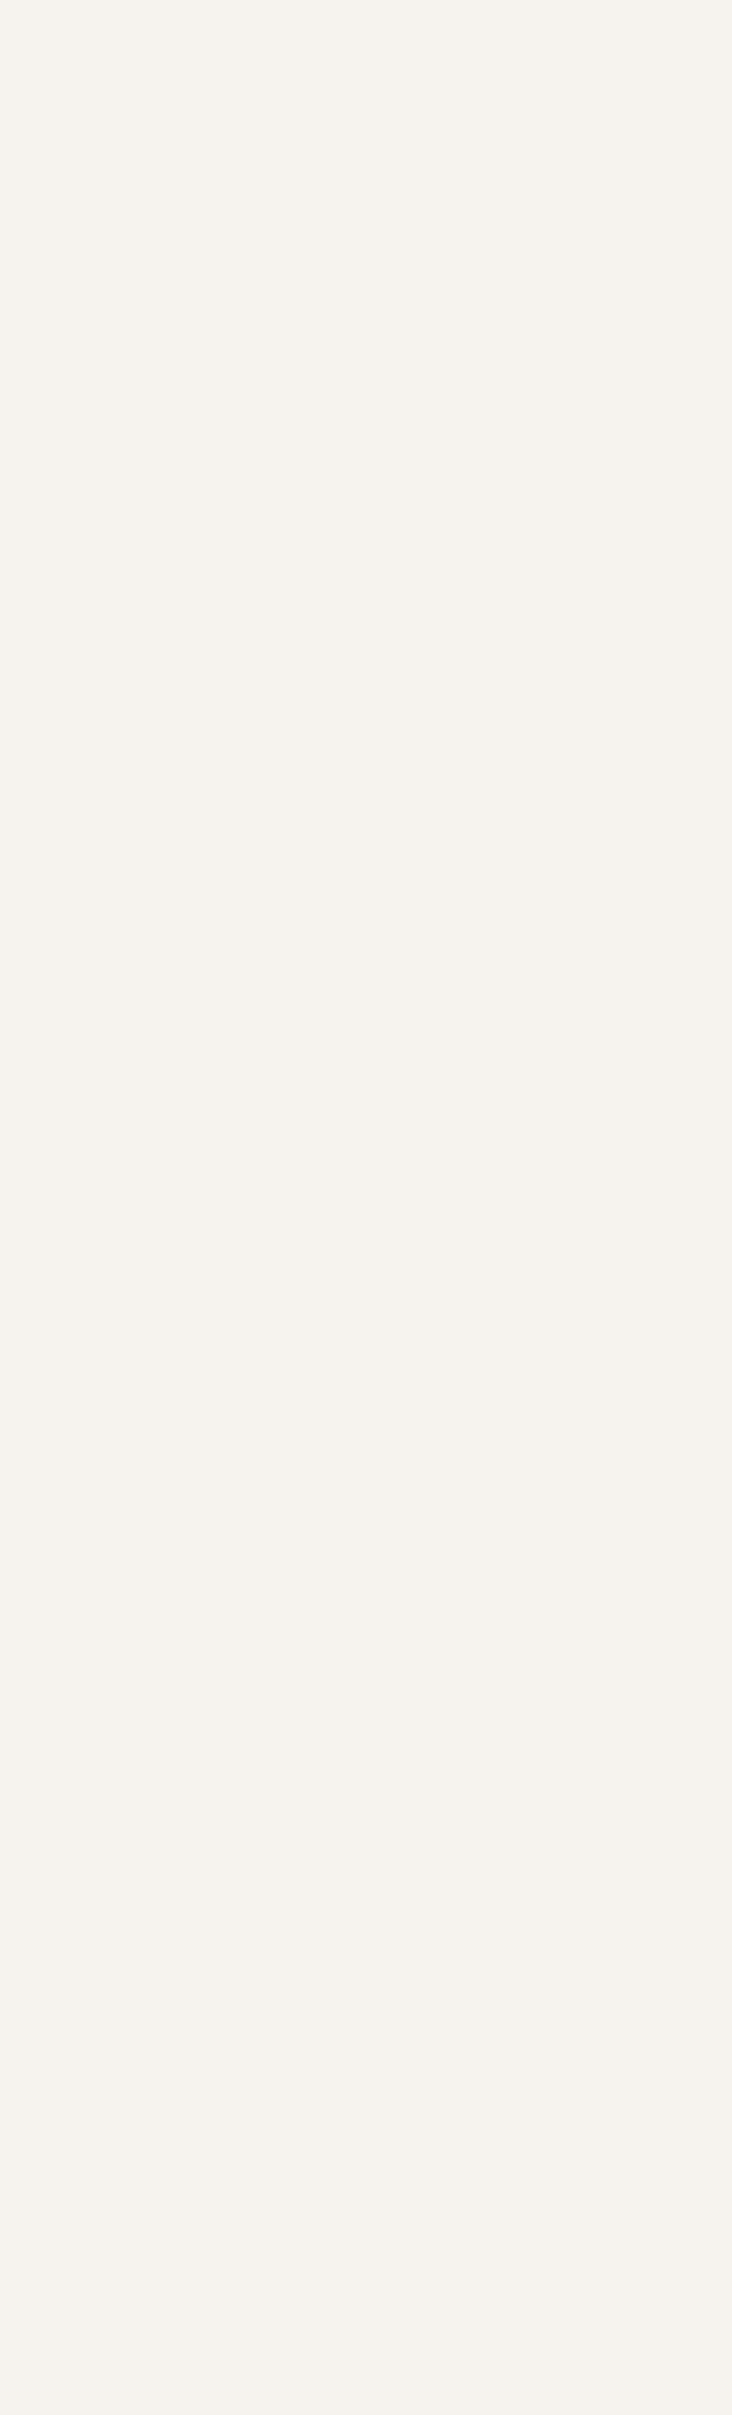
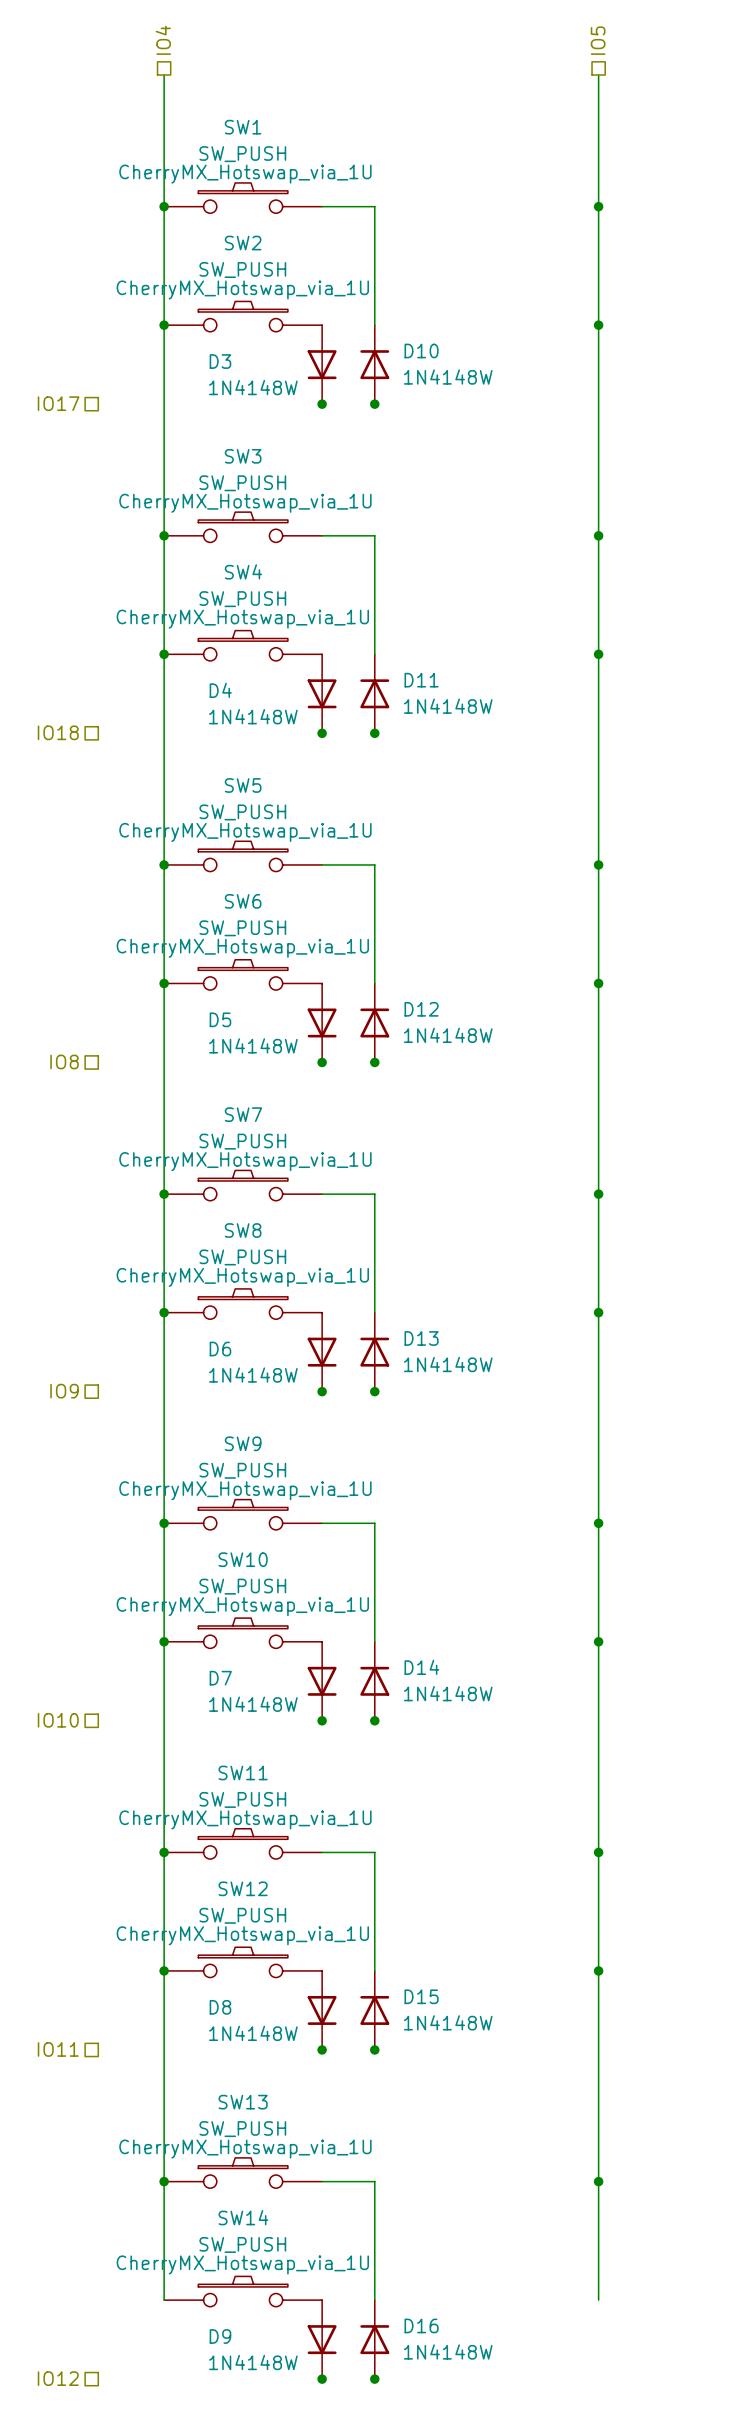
hierarchical label: none -> IO4 (163, 40)
hierarchical label: none -> IO5 (598, 40)
wire: none -> (164, 75) (164, 2300)
wire: none -> (598, 75) (598, 2300)
SW1: none -> SW_PUSH (243, 198)
junction: none -> (164, 206)
wire: none -> (322, 206) (374, 206) (374, 325)
junction: none -> (598, 206)
SW2: none -> SW_PUSH (243, 316)
junction: none -> (164, 325)
junction: none -> (598, 325)
D3: none -> 1N4148W (322, 364)
D10: none -> 1N4148W (374, 364)
hierarchical label: none -> IO17 (58, 403)
junction: none -> (322, 404)
junction: none -> (374, 404)
SW3: none -> SW_PUSH (243, 527)
junction: none -> (164, 535)
wire: none -> (322, 535) (374, 535) (374, 654)
junction: none -> (598, 535)
SW4: none -> SW_PUSH (243, 645)
junction: none -> (164, 654)
junction: none -> (598, 654)
D4: none -> 1N4148W (322, 693)
D11: none -> 1N4148W (374, 693)
hierarchical label: none -> IO18 (58, 732)
junction: none -> (322, 733)
junction: none -> (374, 733)
SW5: none -> SW_PUSH (243, 856)
junction: none -> (164, 864)
wire: none -> (322, 864) (374, 864) (374, 983)
junction: none -> (598, 864)
SW6: none -> SW_PUSH (243, 974)
junction: none -> (164, 983)
junction: none -> (598, 983)
D5: none -> 1N4148W (322, 1022)
D12: none -> 1N4148W (374, 1022)
hierarchical label: none -> IO8 (64, 1061)
junction: none -> (322, 1062)
junction: none -> (374, 1062)
SW7: none -> SW_PUSH (243, 1185)
junction: none -> (164, 1194)
wire: none -> (322, 1194) (374, 1194) (374, 1312)
junction: none -> (598, 1194)
SW8: none -> SW_PUSH (243, 1304)
junction: none -> (164, 1312)
junction: none -> (598, 1312)
D6: none -> 1N4148W (322, 1352)
D13: none -> 1N4148W (374, 1352)
hierarchical label: none -> IO9 (64, 1391)
junction: none -> (322, 1391)
junction: none -> (374, 1391)
SW9: none -> SW_PUSH (243, 1514)
junction: none -> (164, 1523)
wire: none -> (322, 1523) (374, 1523) (374, 1641)
junction: none -> (598, 1523)
SW10: none -> SW_PUSH (243, 1633)
junction: none -> (164, 1641)
junction: none -> (598, 1641)
D7: none -> 1N4148W (322, 1681)
D14: none -> 1N4148W (374, 1681)
hierarchical label: none -> IO10 (58, 1720)
junction: none -> (322, 1720)
junction: none -> (374, 1720)
SW11: none -> SW_PUSH (243, 1843)
junction: none -> (164, 1852)
wire: none -> (322, 1852) (374, 1852) (374, 1970)
junction: none -> (598, 1852)
SW12: none -> SW_PUSH (243, 1962)
junction: none -> (164, 1970)
junction: none -> (598, 1970)
D8: none -> 1N4148W (322, 2010)
D15: none -> 1N4148W (374, 2010)
hierarchical label: none -> IO11 (58, 2049)
junction: none -> (322, 2049)
junction: none -> (374, 2049)
SW13: none -> SW_PUSH (243, 2173)
junction: none -> (164, 2181)
wire: none -> (322, 2181) (374, 2181) (374, 2300)
junction: none -> (598, 2181)
SW14: none -> SW_PUSH (243, 2291)
D9: none -> 1N4148W (322, 2339)
D16: none -> 1N4148W (374, 2339)
hierarchical label: none -> IO12 (58, 2378)
junction: none -> (322, 2379)
junction: none -> (374, 2379)

